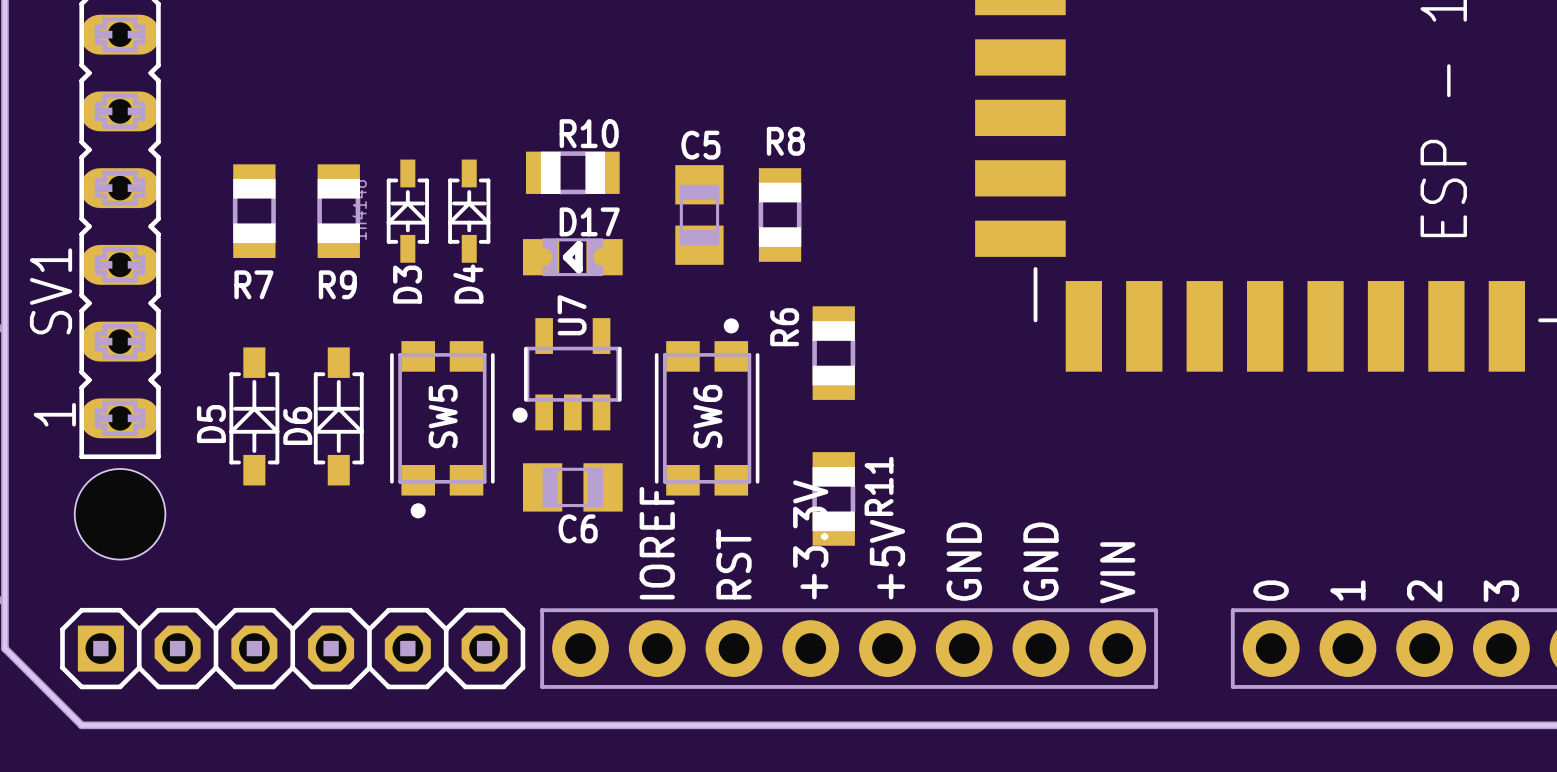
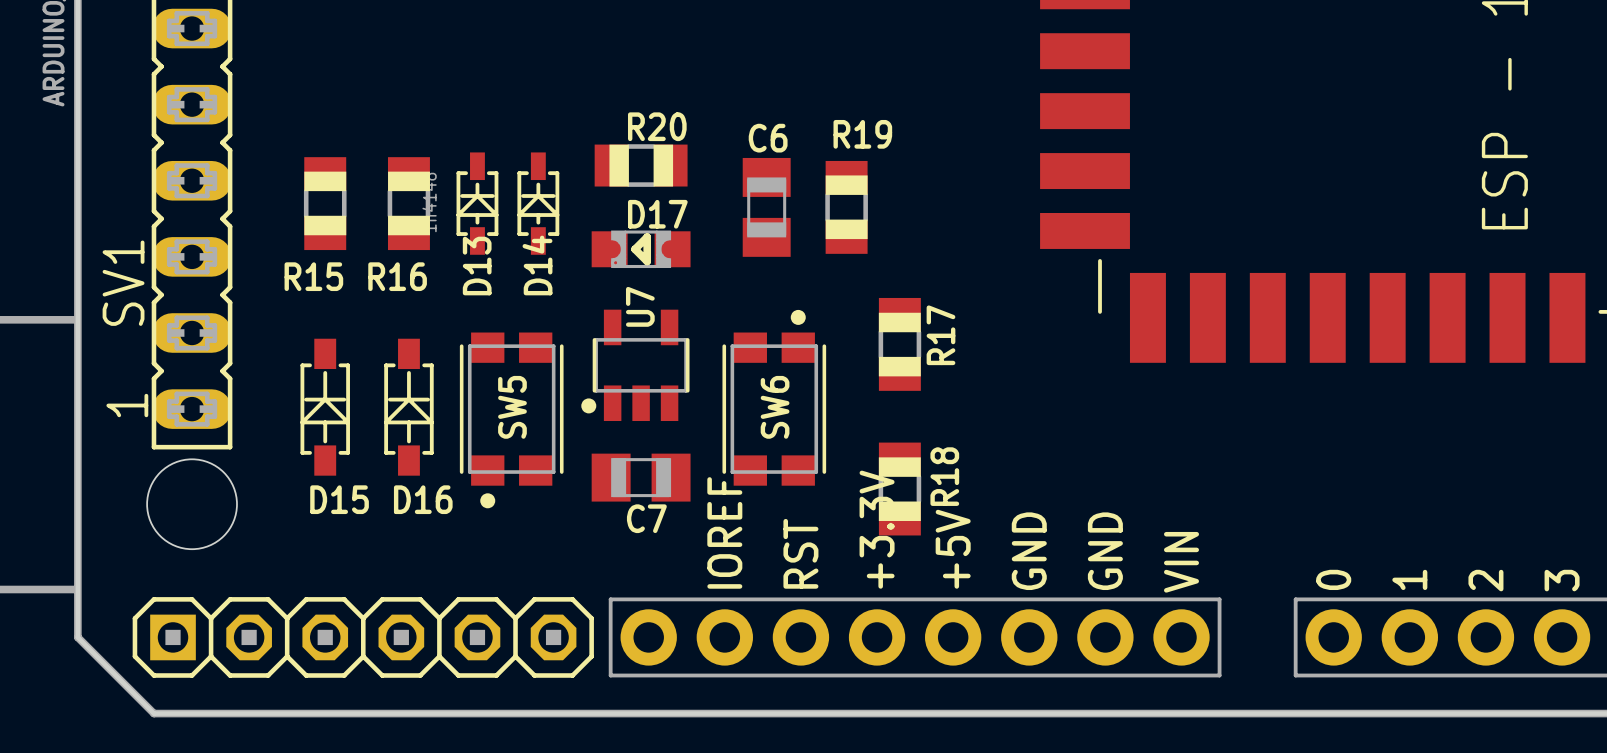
R10 name: R10 (589, 133) -> R20 (657, 126)
R8 name: R8 (785, 141) -> R19 (862, 134)
C5 name: C5 (700, 145) -> C6 (768, 138)
R7 name: R7 (253, 284) -> R15 (313, 276)
R9 name: R9 (337, 284) -> R16 (397, 276)
D3 name: D3 (407, 284) -> D13 (477, 266)
D4 name: D4 (468, 284) -> D14 (537, 265)
R6 name: R6 (784, 327) -> R17 (940, 335)
D5 name: D5 (211, 424) -> D15 (339, 499)
D6 name: D6 (297, 425) -> D16 (423, 499)
R11 name: R11 (879, 486) -> R18 (944, 476)
C6 name: C6 (578, 528) -> C7 (646, 518)

